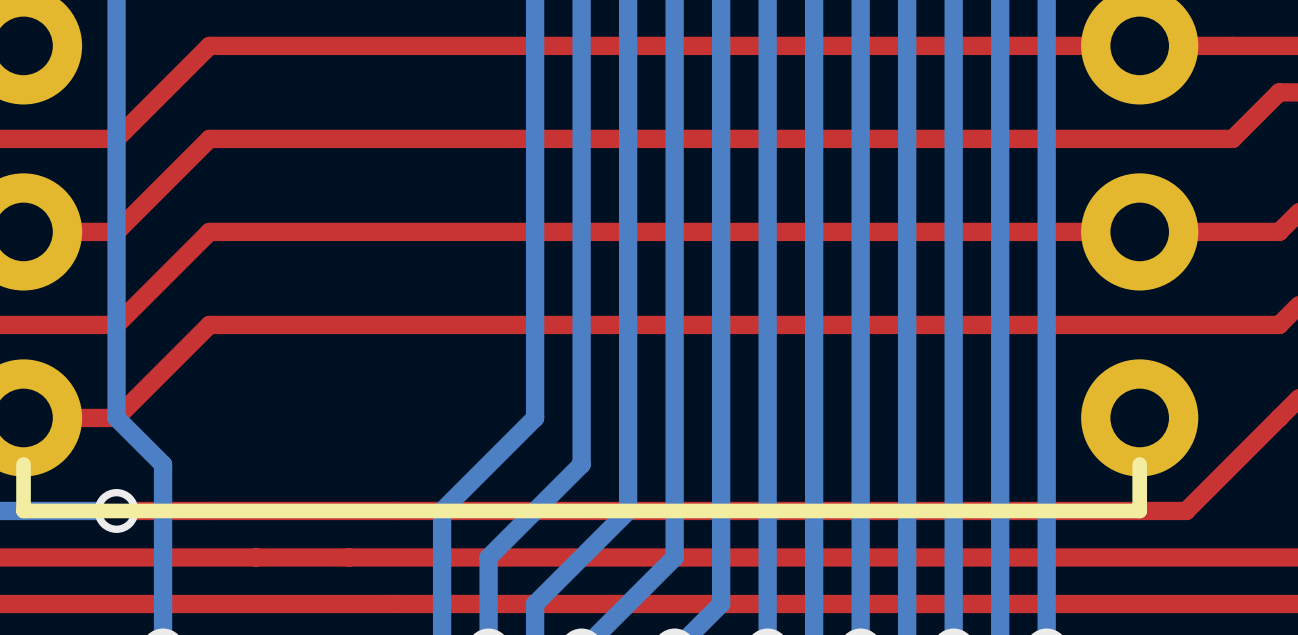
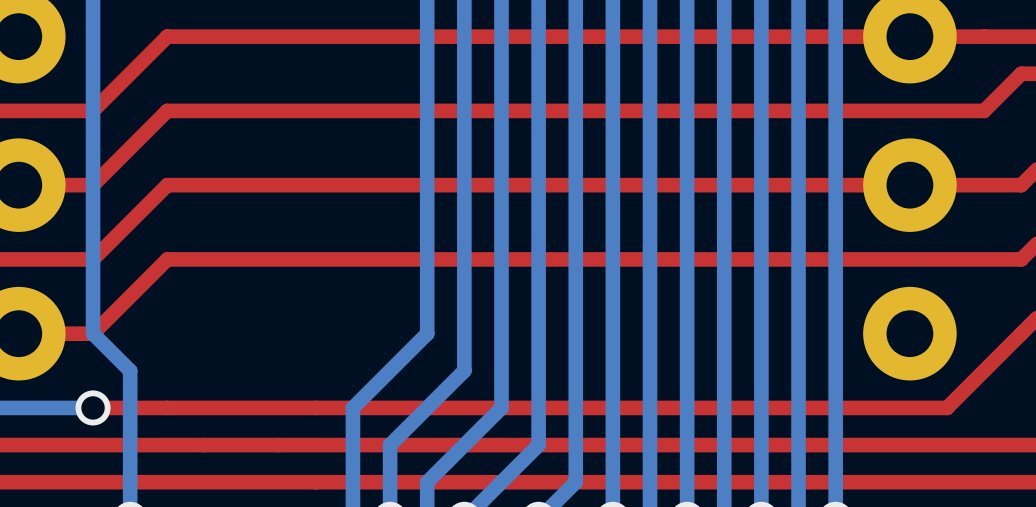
line: (1139, 464) (1139, 510) (23, 510) (23, 464) -> none

